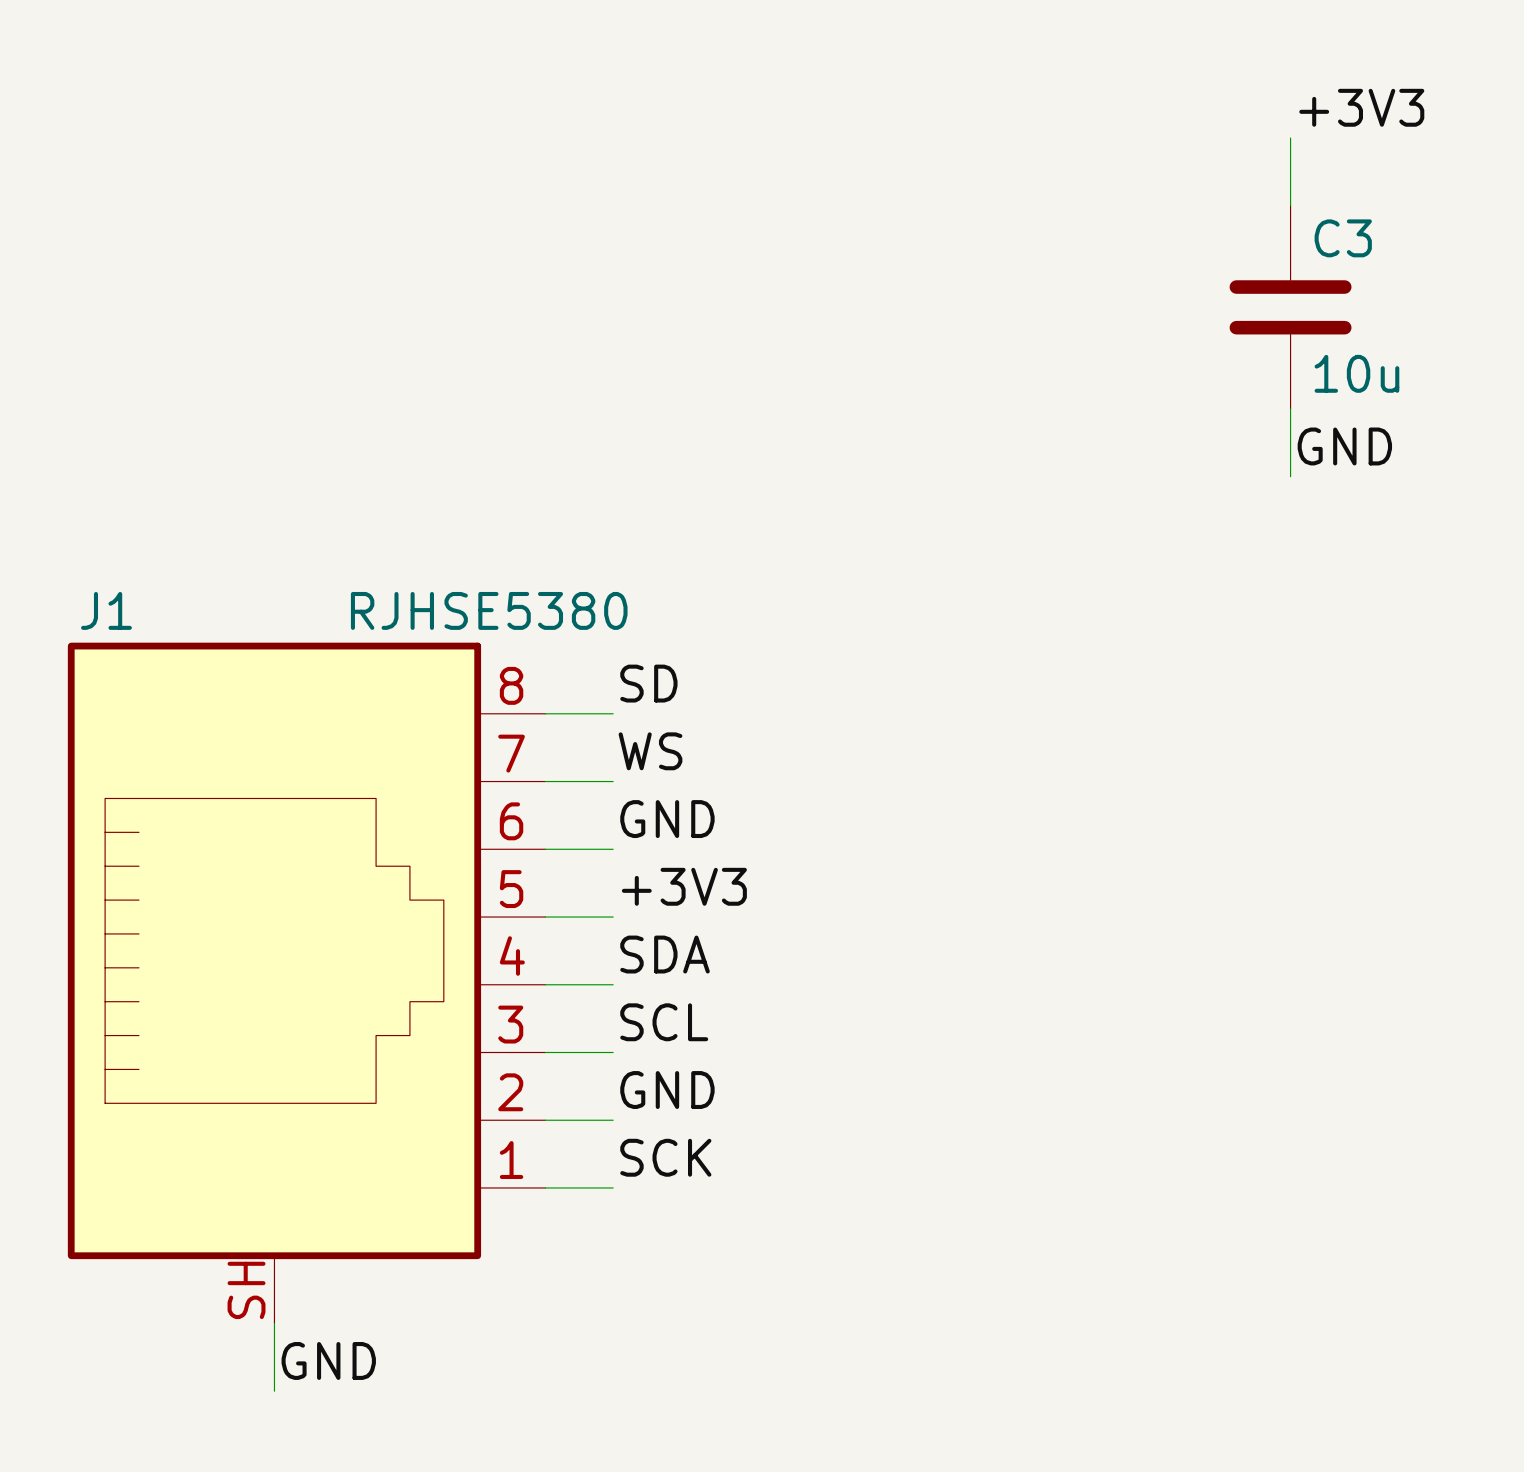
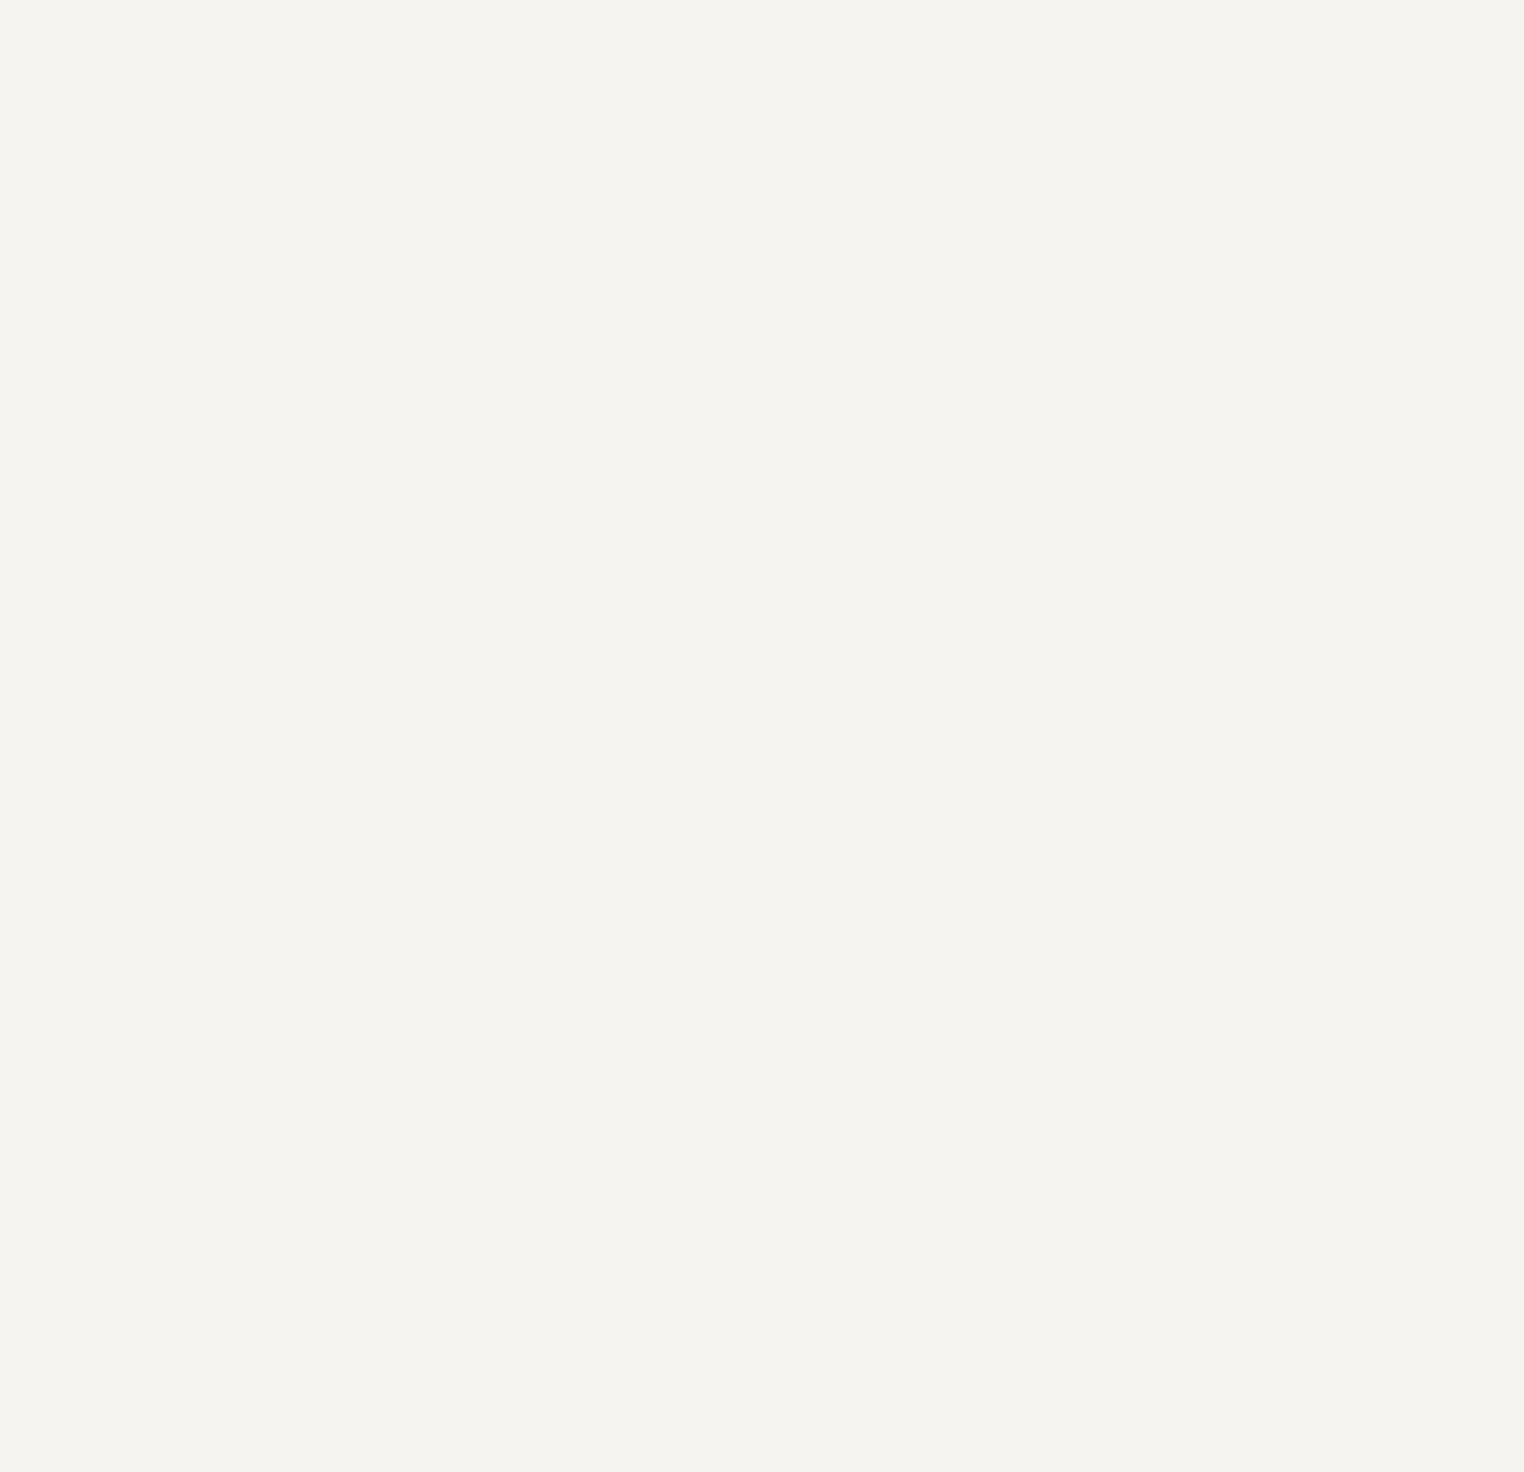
label: +3V3 (1361, 107) -> none
wire: (1290, 138) (1290, 205) -> none
C3: 10u (1290, 307) -> none
wire: (1290, 408) (1290, 476) -> none
label: GND (1344, 446) -> none
label: SD (648, 683) -> none
wire: (545, 713) (613, 713) -> none
label: WS (650, 751) -> none
wire: (545, 781) (613, 781) -> none
label: GND (667, 819) -> none
wire: (545, 849) (613, 849) -> none
label: +3V3 (684, 886) -> none
wire: (545, 917) (613, 917) -> none
label: SDA (665, 954) -> none
J1: RJHSE5380 (306, 983) -> none
wire: (545, 984) (613, 984) -> none
label: SCL (664, 1022) -> none
wire: (545, 1052) (613, 1052) -> none
label: GND (667, 1090) -> none
wire: (545, 1120) (613, 1120) -> none
label: SCK (665, 1157) -> none
wire: (545, 1187) (613, 1187) -> none
wire: (274, 1323) (274, 1391) -> none
label: GND (328, 1360) -> none

